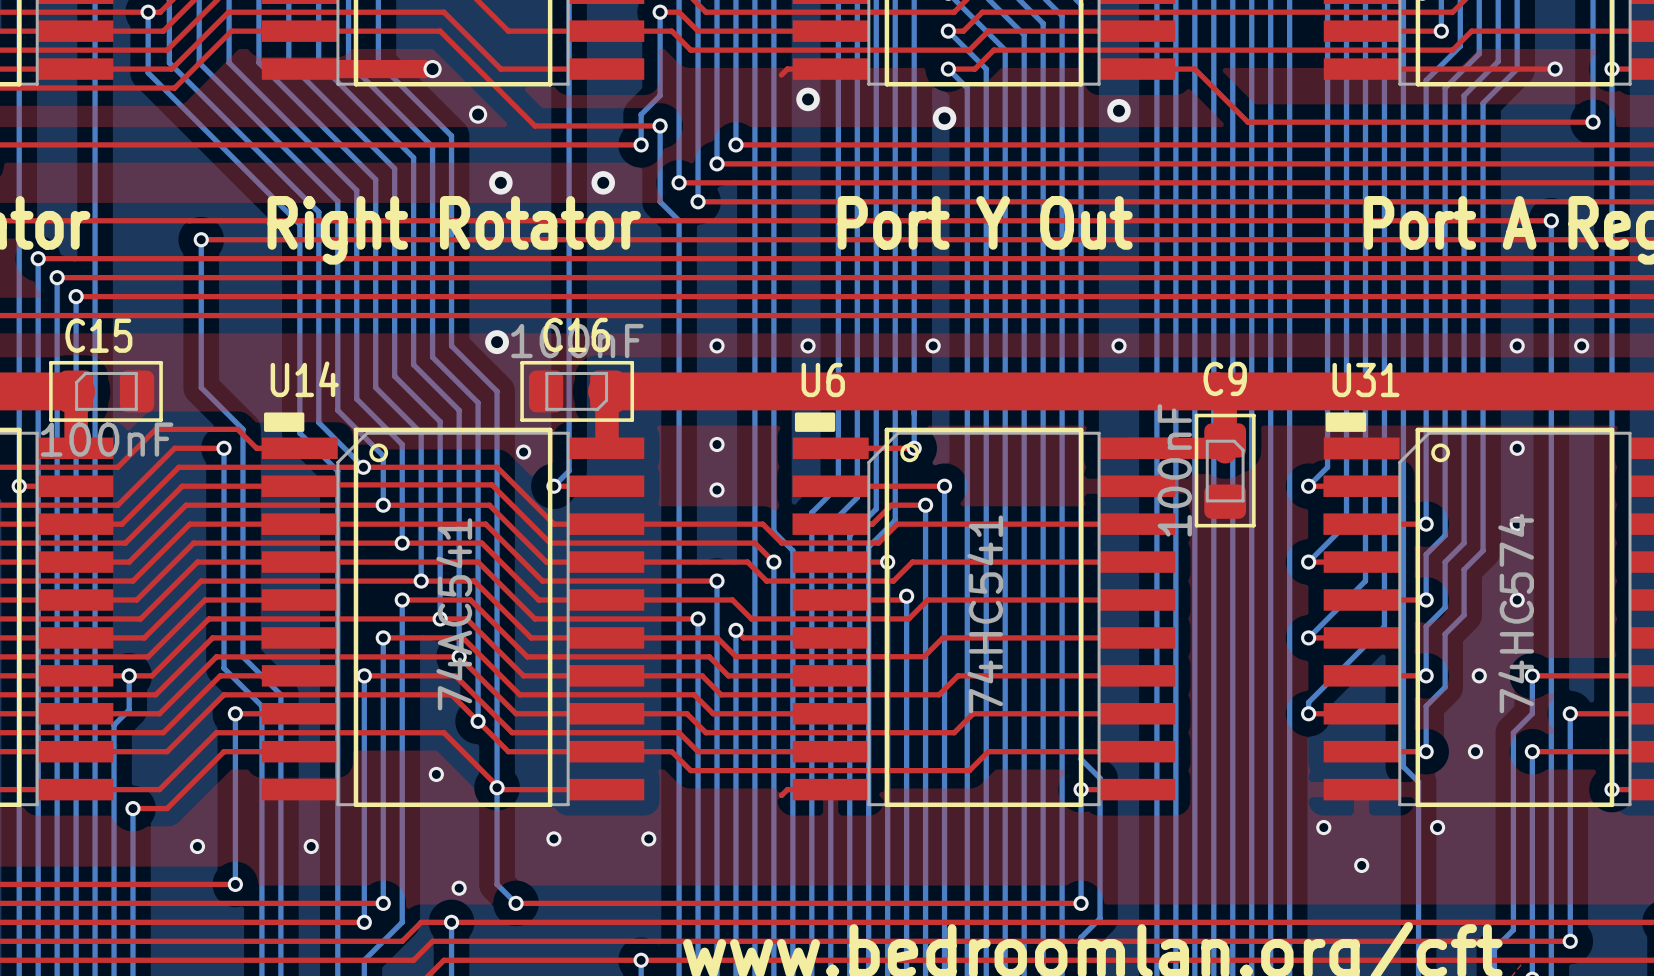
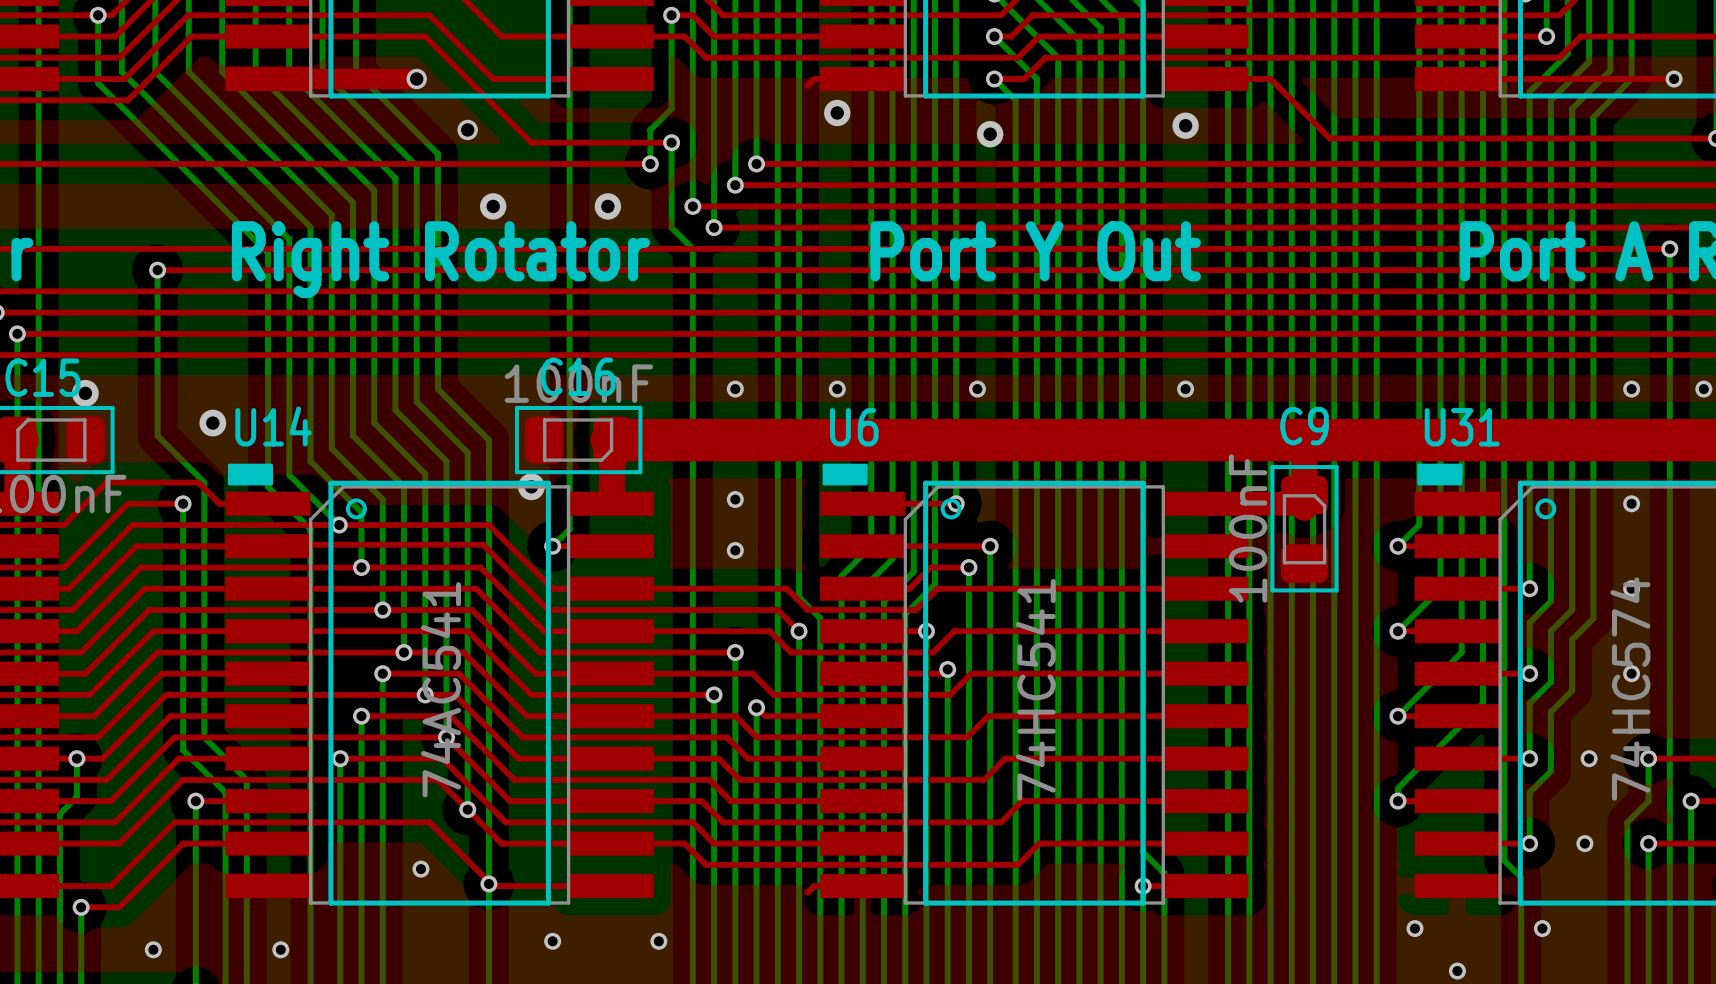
via position: (497, 342) -> (531, 486)
via: none -> (85, 393)
via: none -> (212, 423)
via: (523, 452) -> none

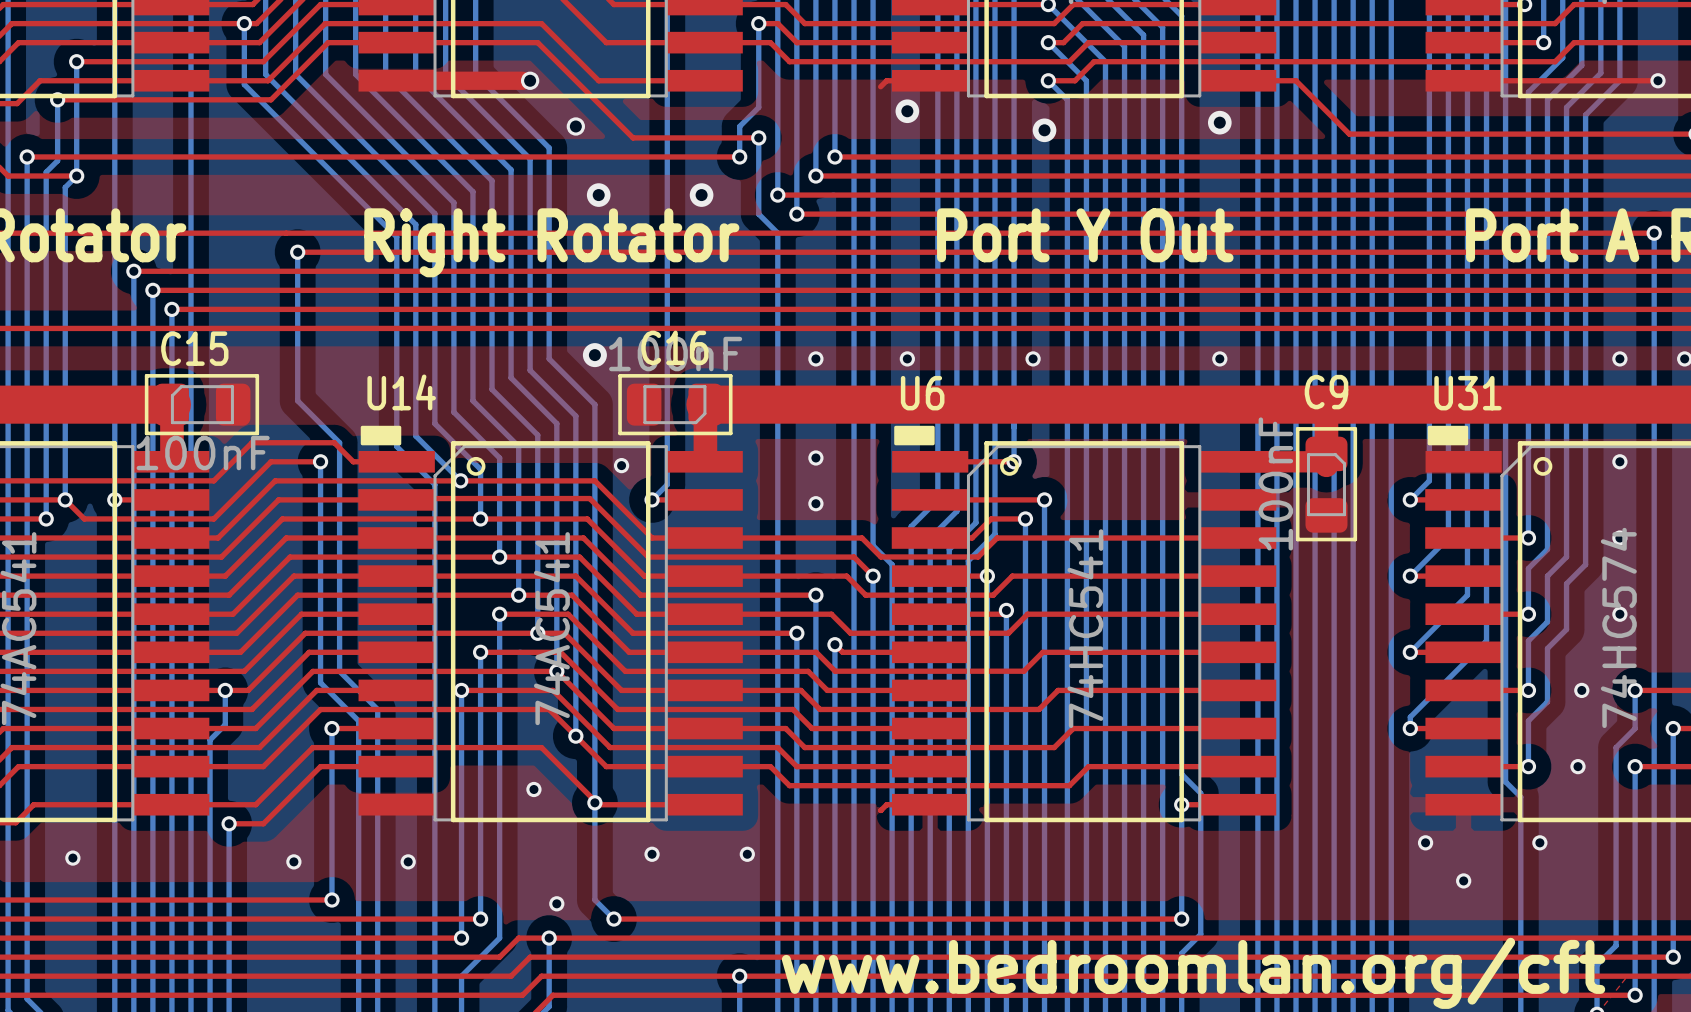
via: (85, 393) -> none
via: (212, 423) -> none
via position: (531, 486) -> (594, 355)
via: none -> (621, 465)

